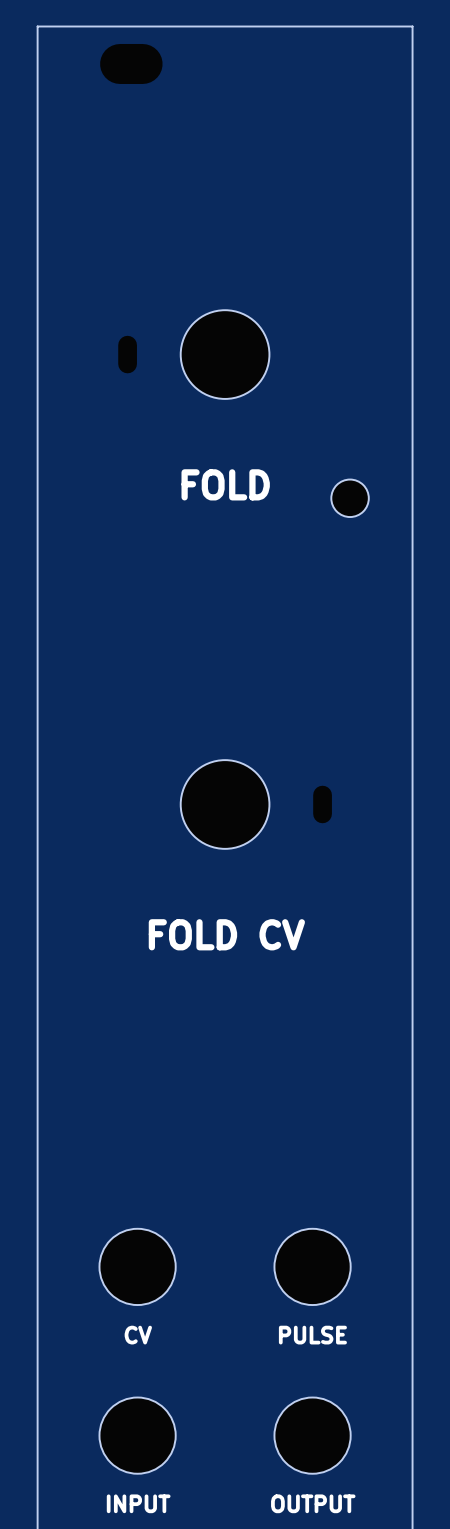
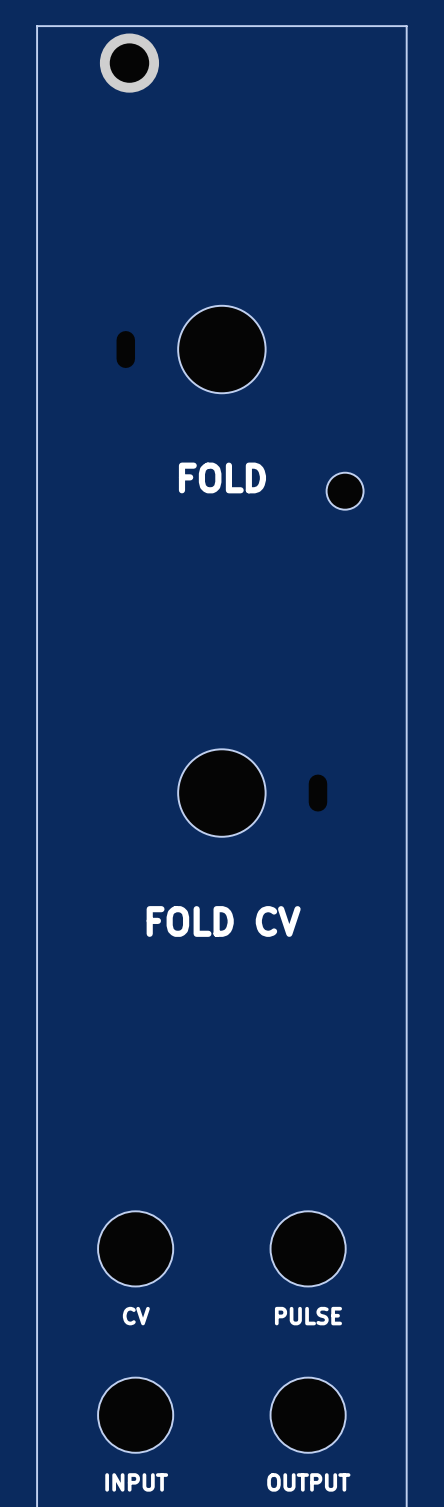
part footprint: [100, 43, 163, 84] -> [99, 33, 160, 93]

